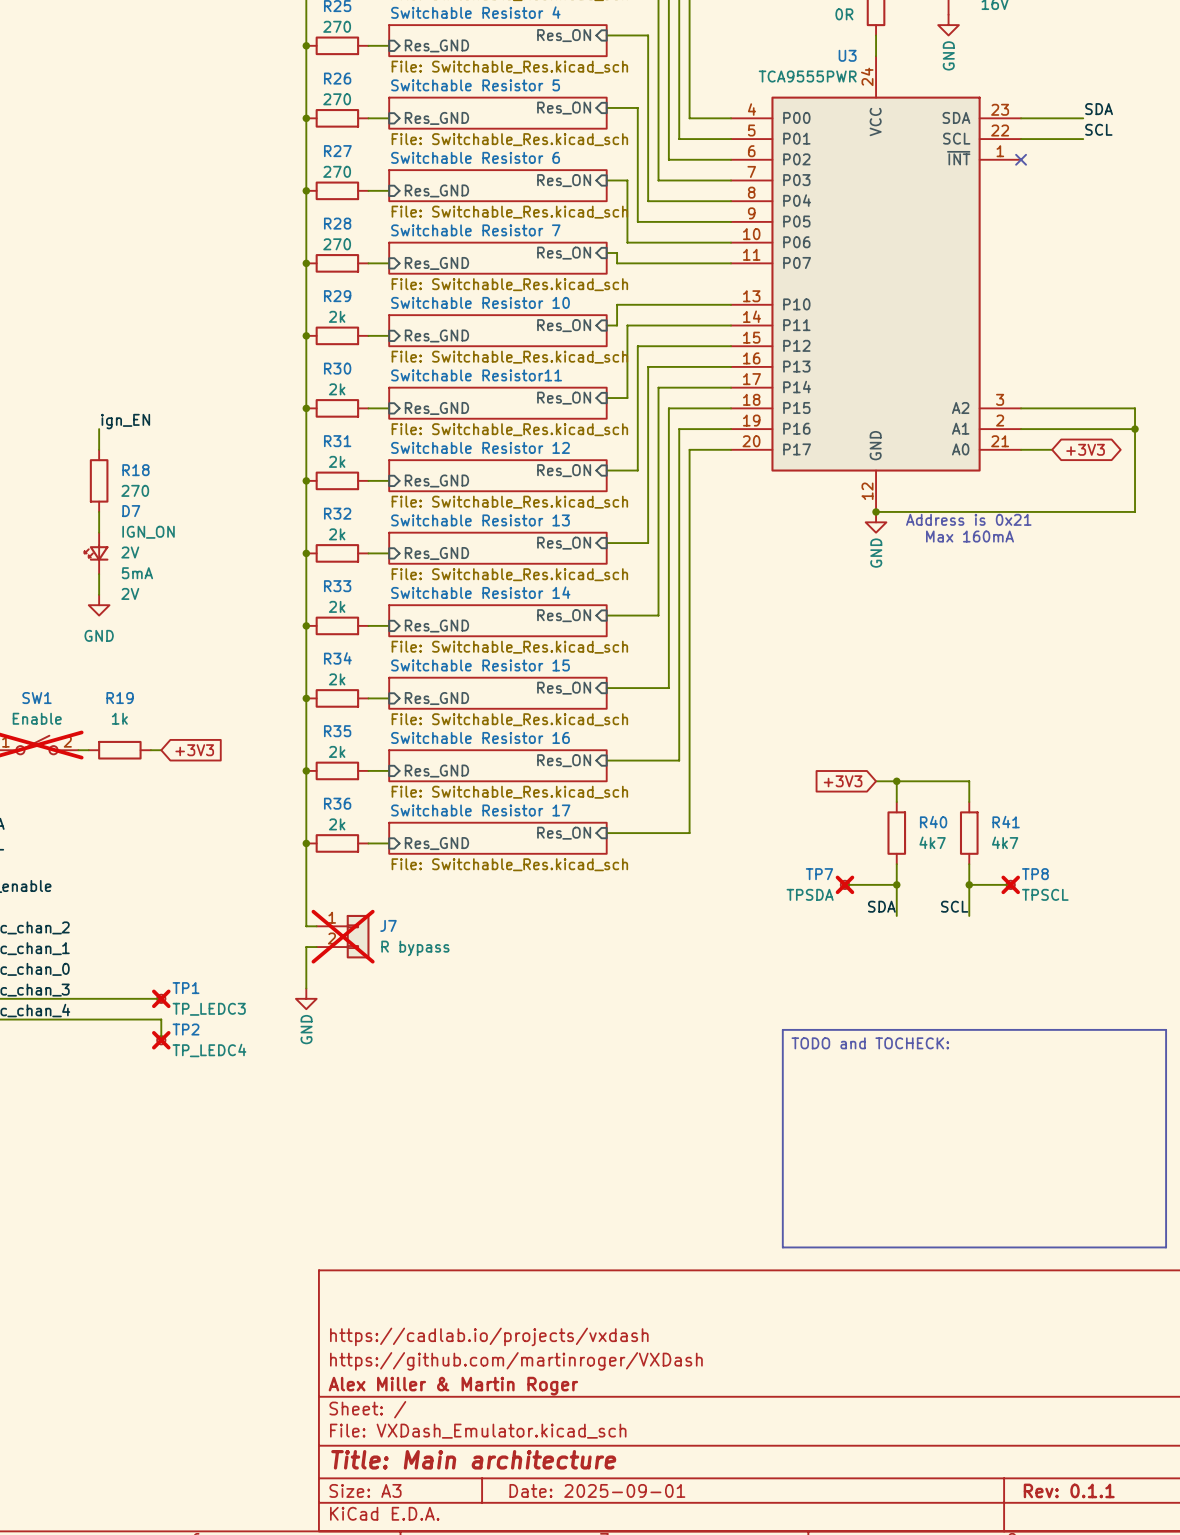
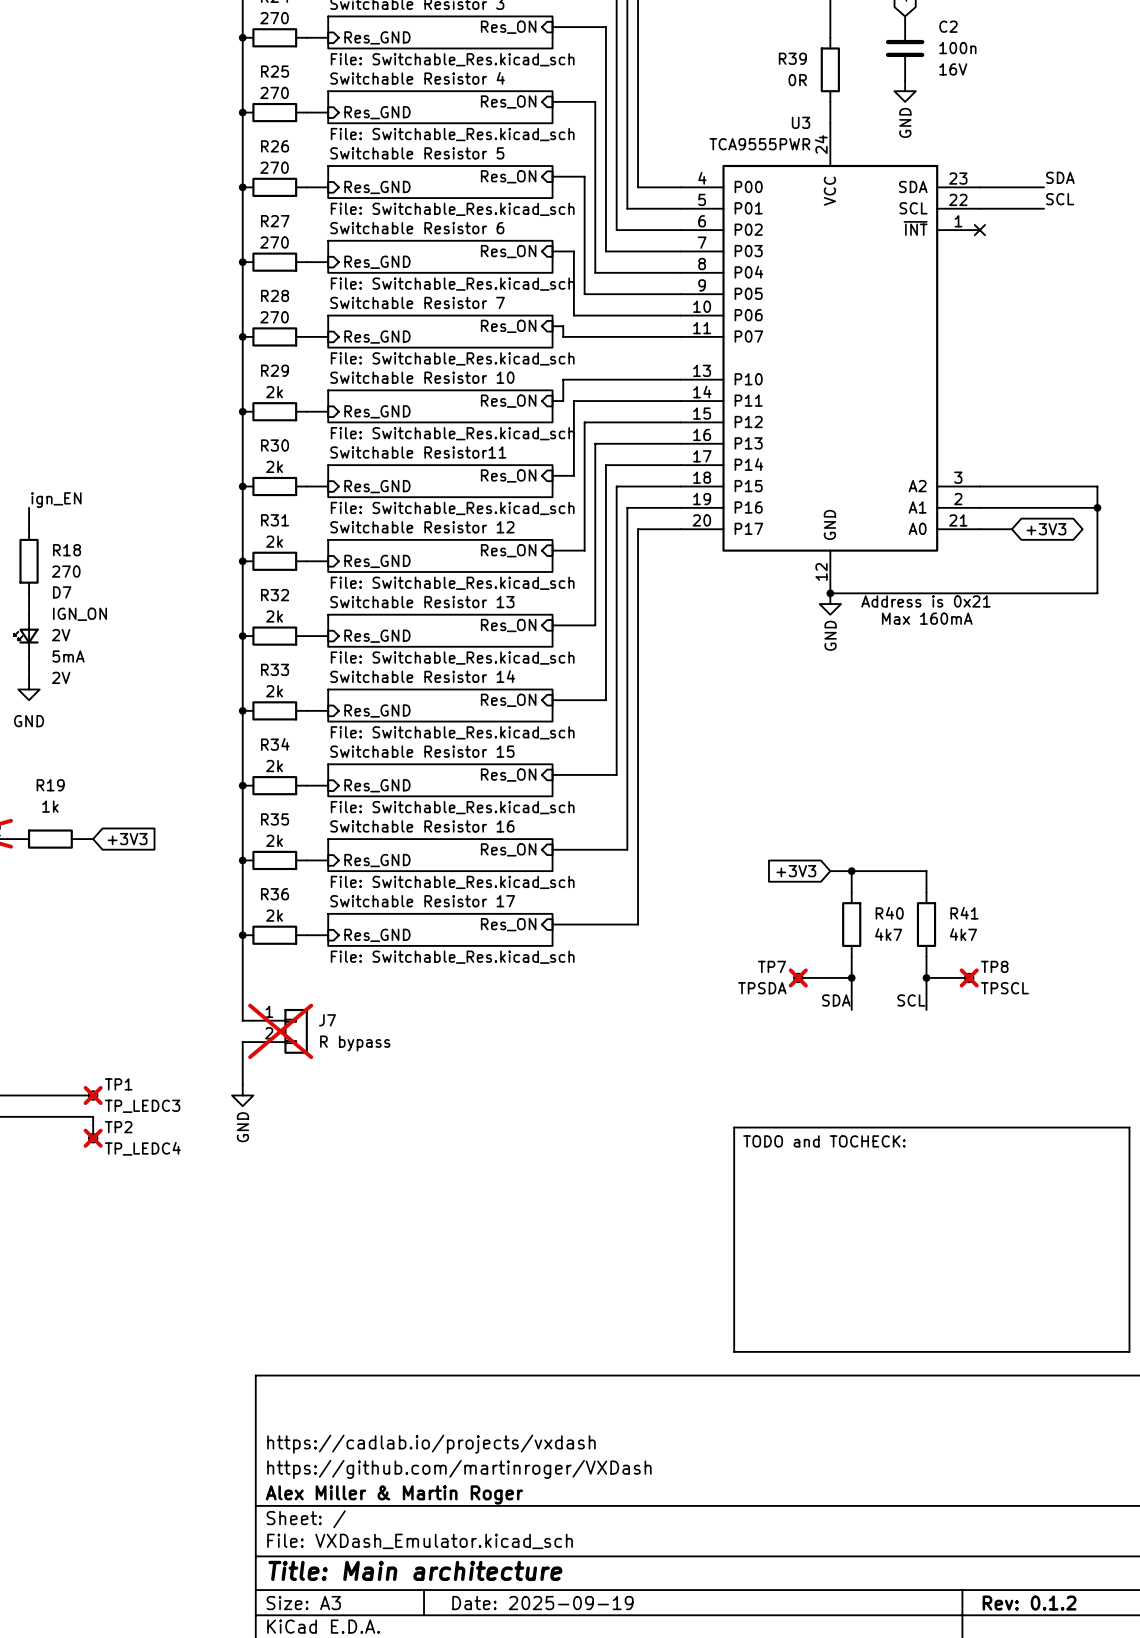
title block: Date: 2025-09-01 (597, 1490) -> Date: 2025-09-19 (542, 1603)
title block: Rev: 0.1.1 (1069, 1490) -> Rev: 0.1.2 (1029, 1603)

